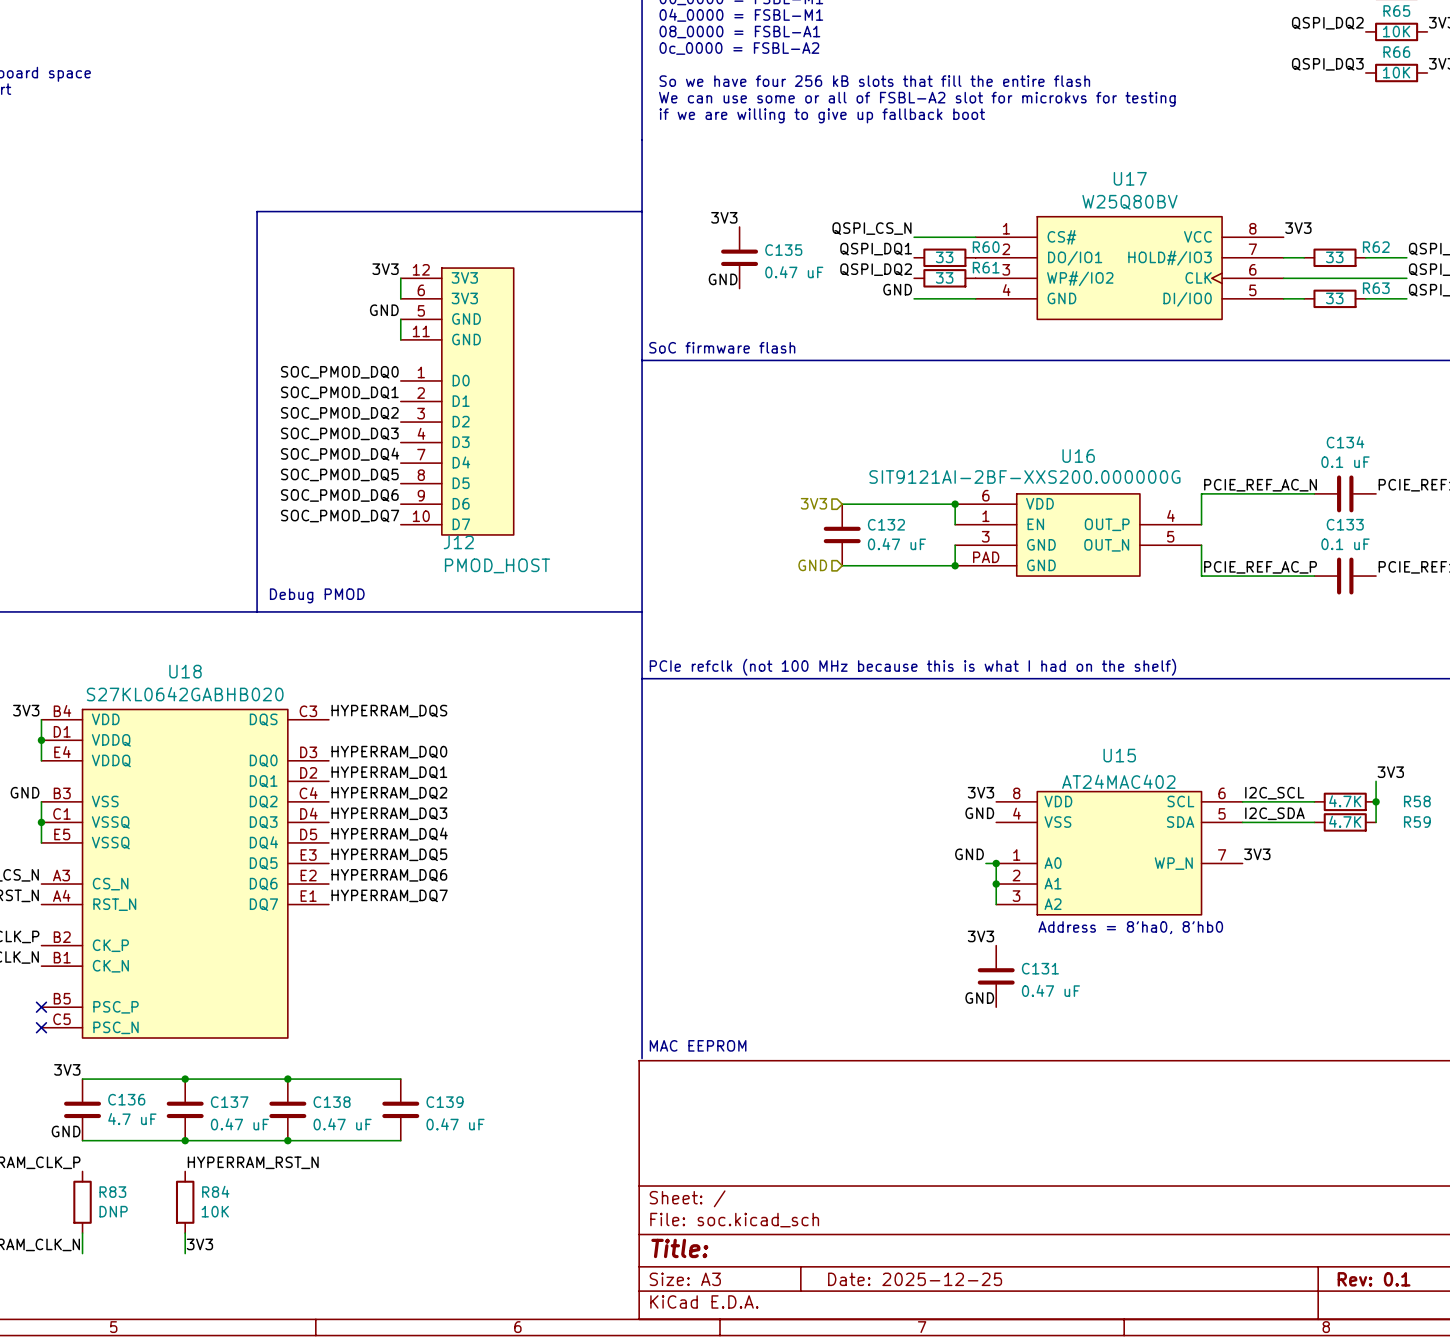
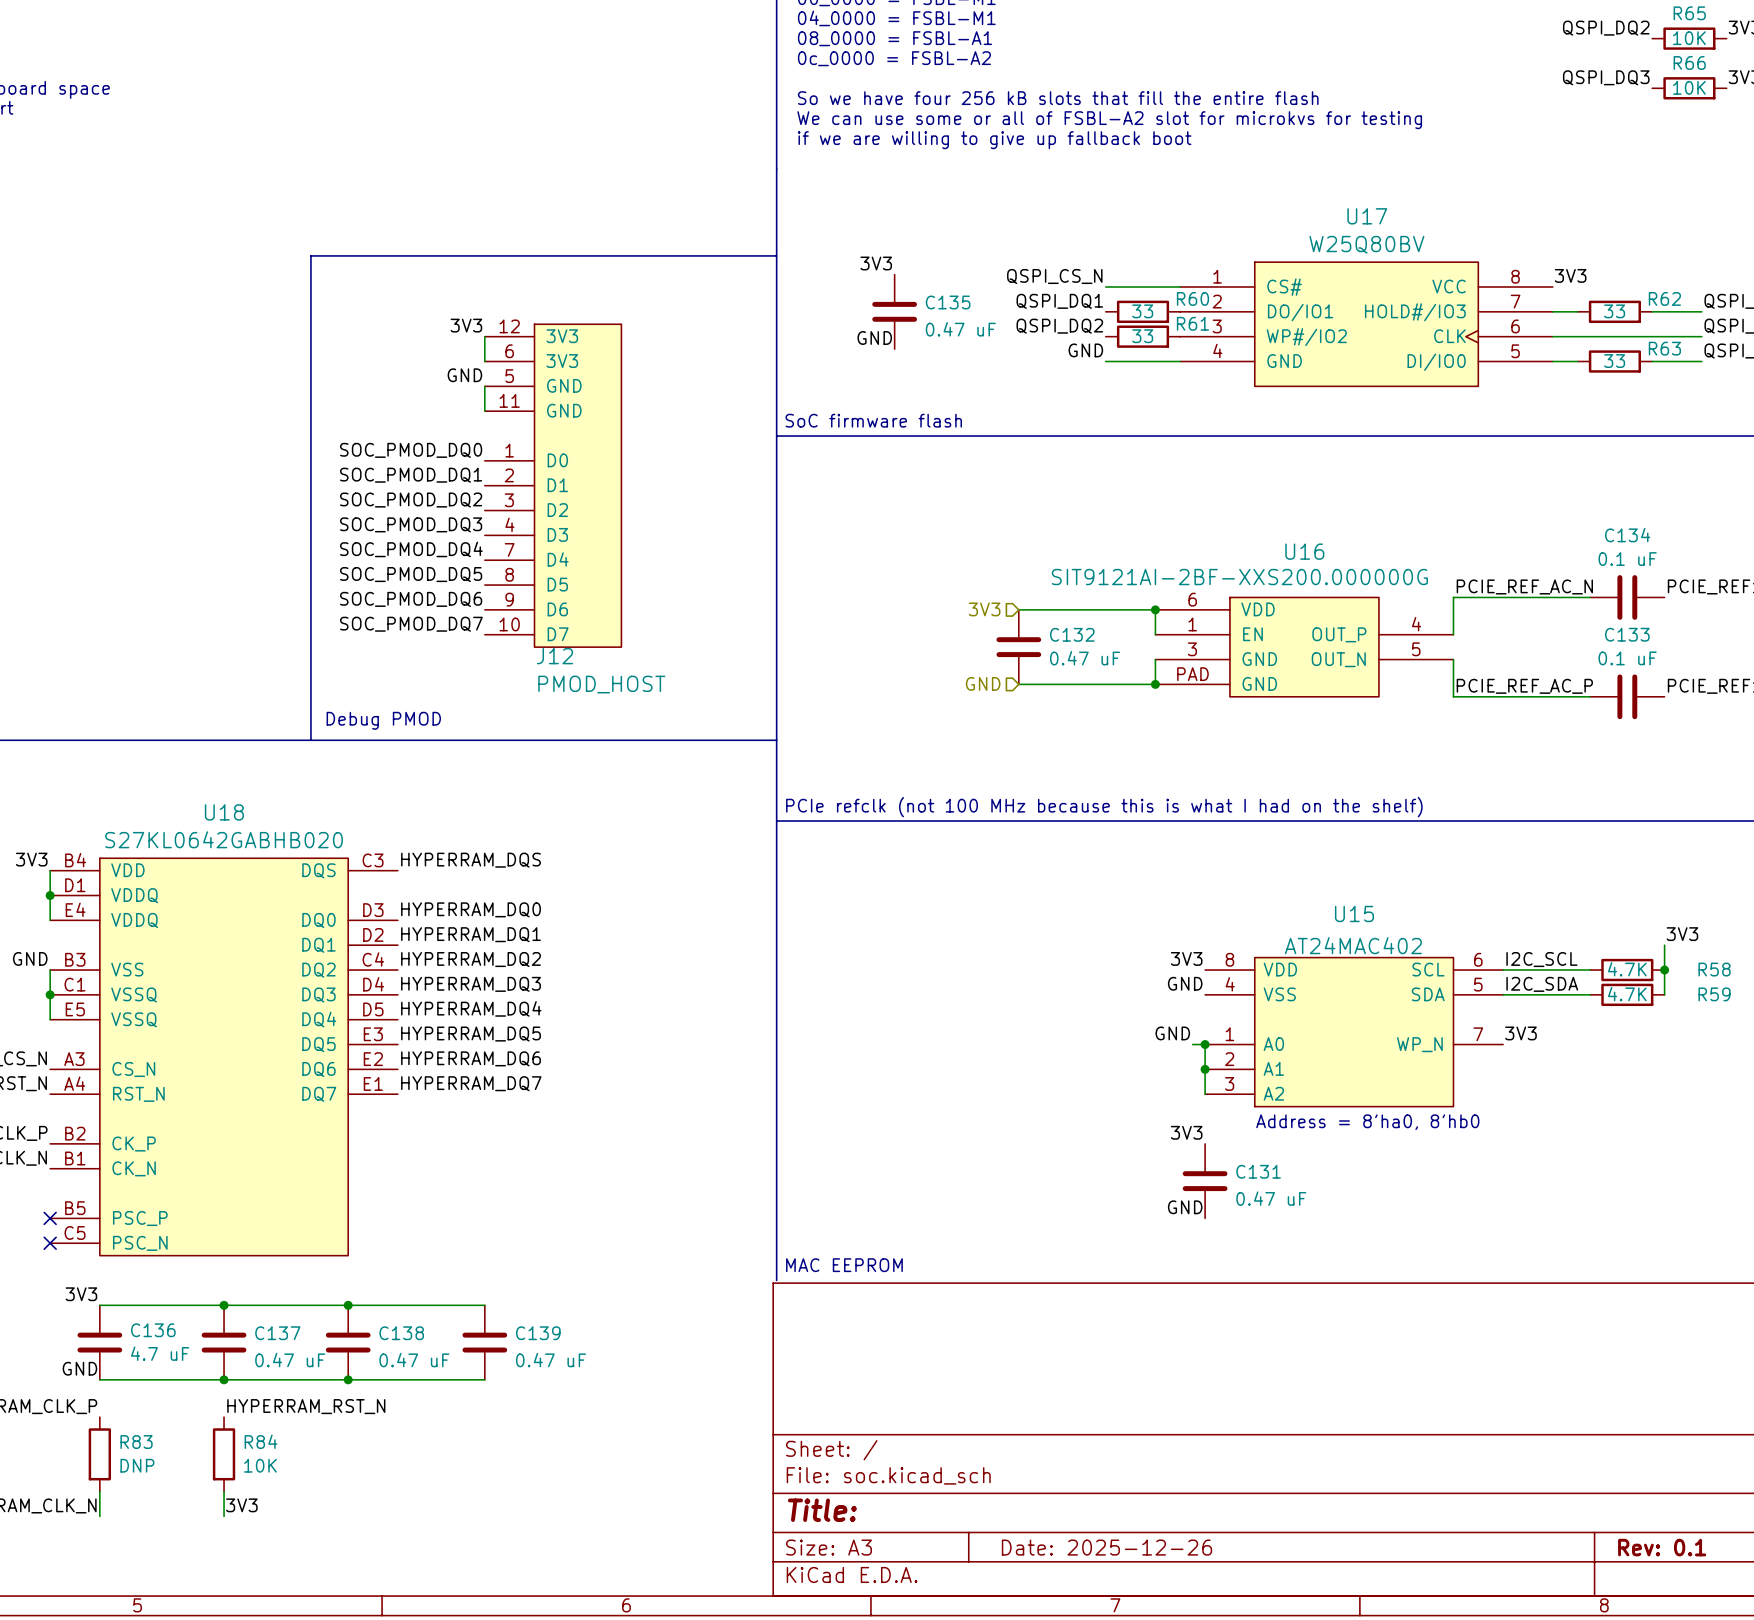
title block: Date: 2025-12-25 (915, 1279) -> Date: 2025-12-26 (1106, 1547)

